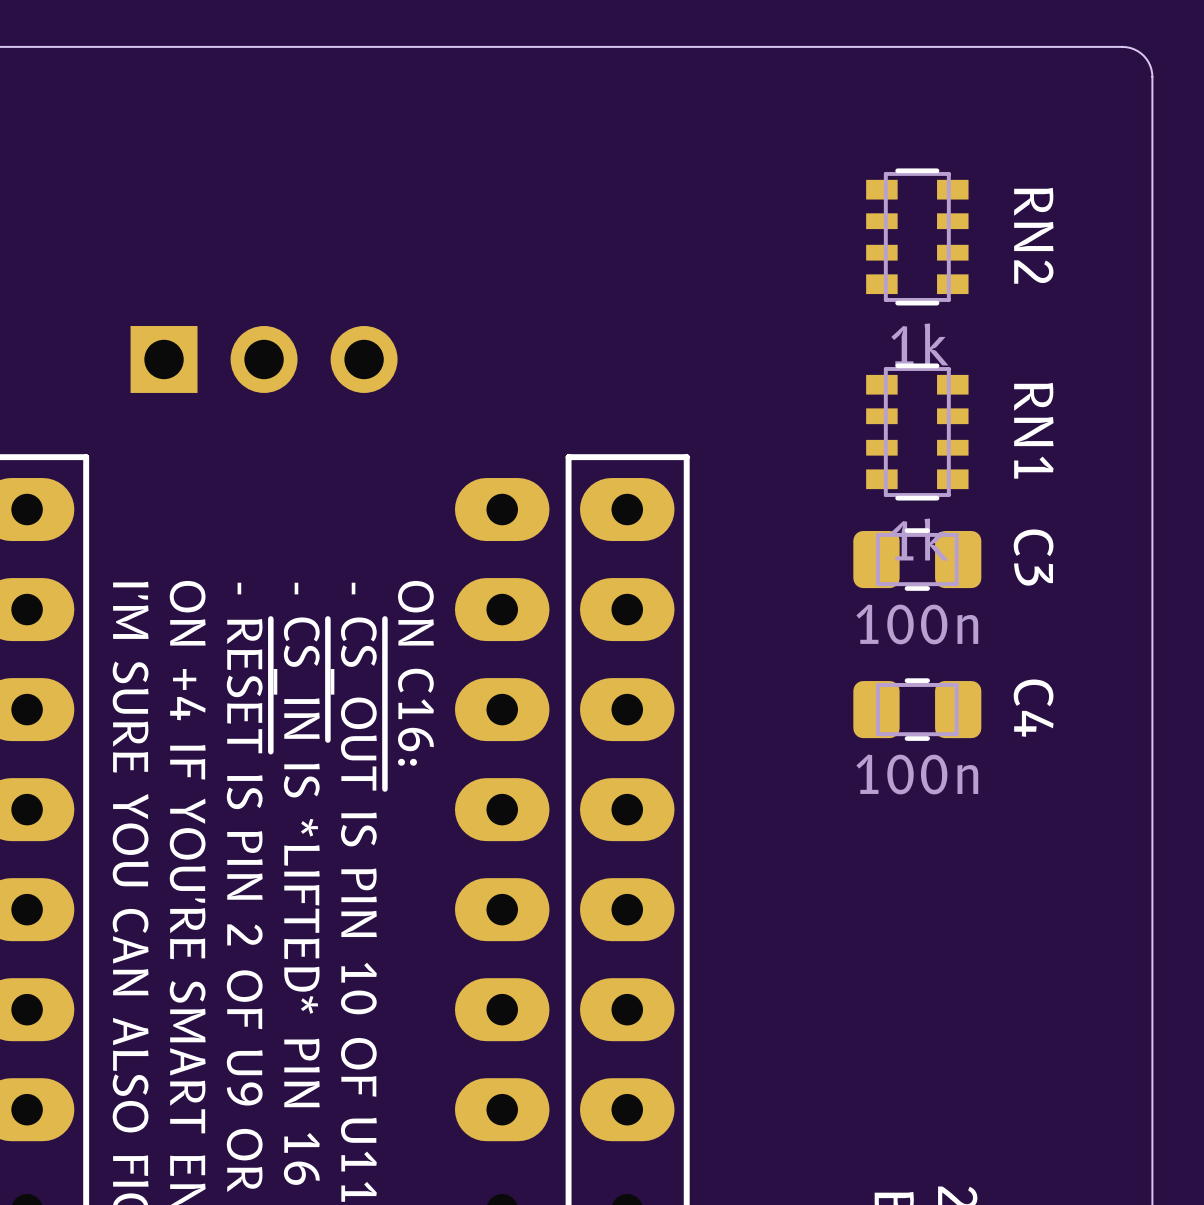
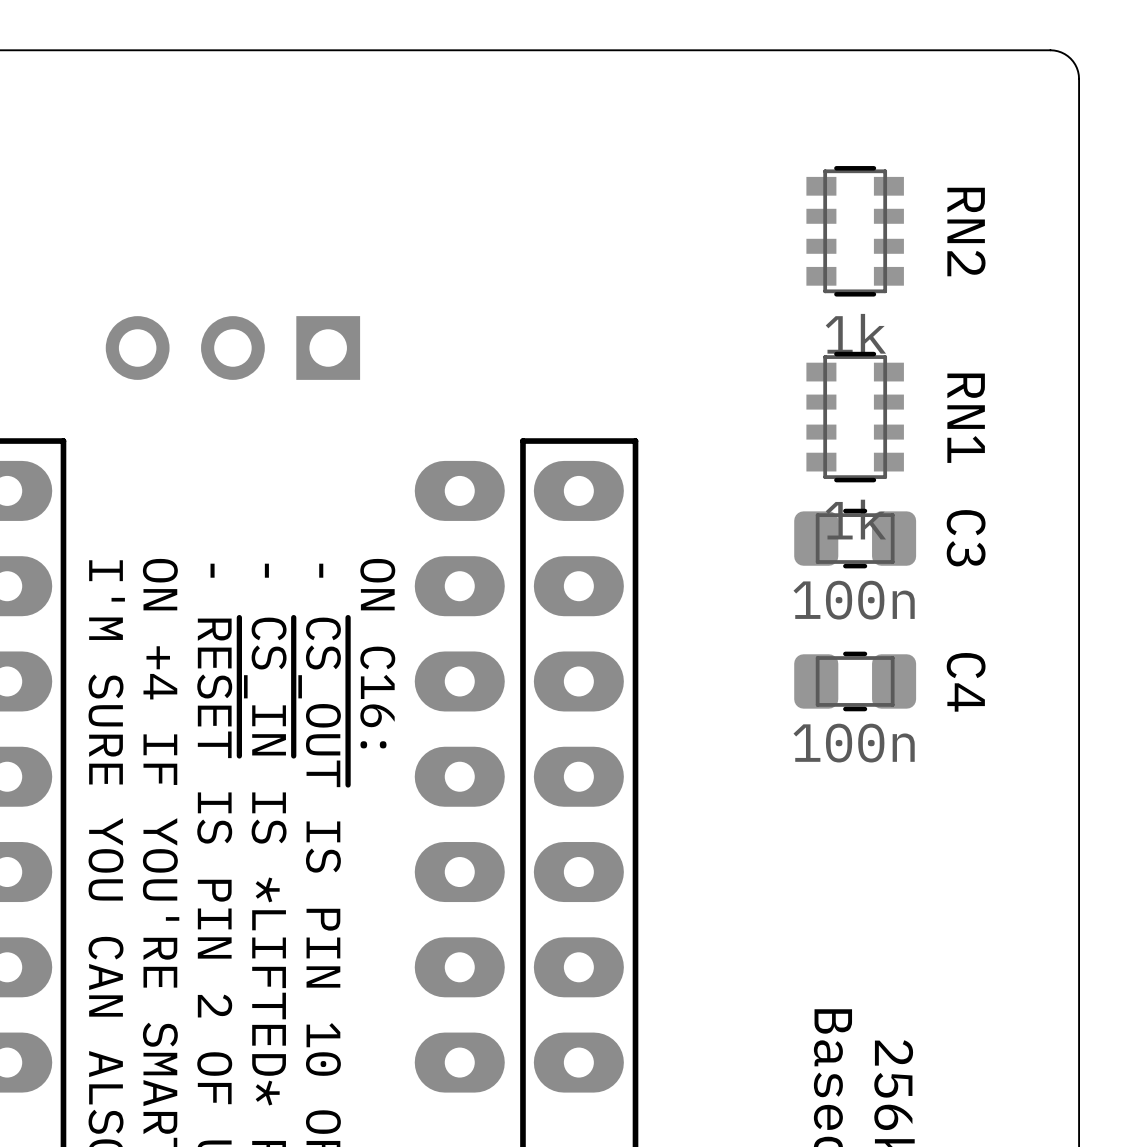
part rotation: 0° (264, 359) -> 180° (232, 348)

